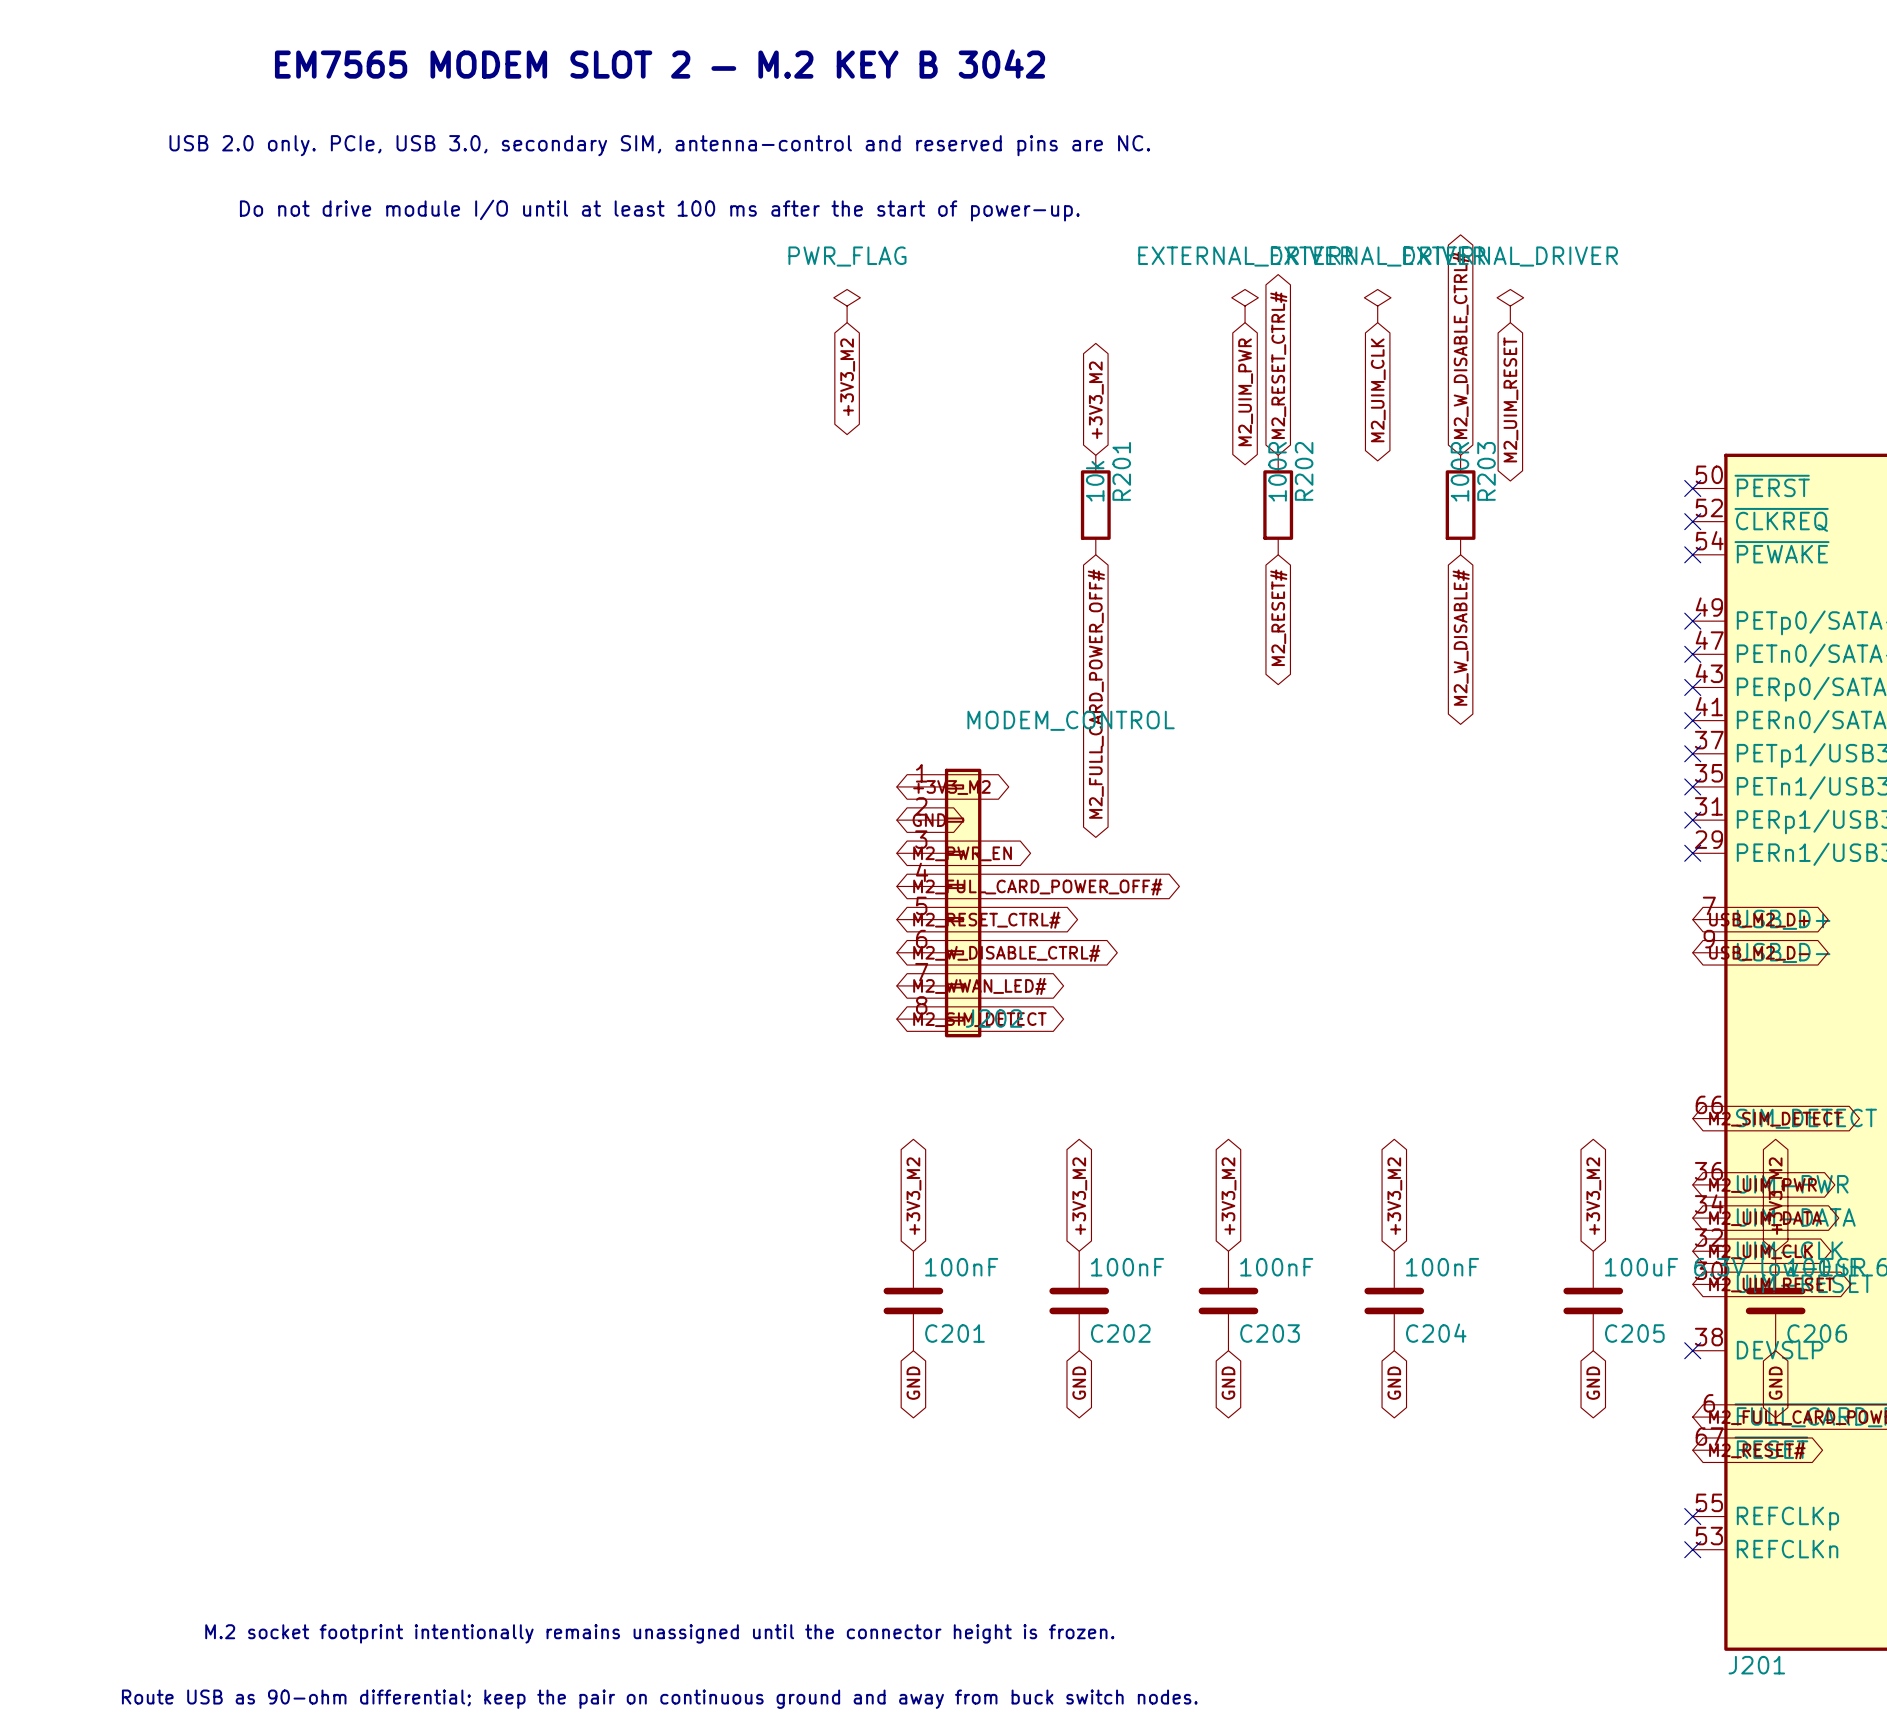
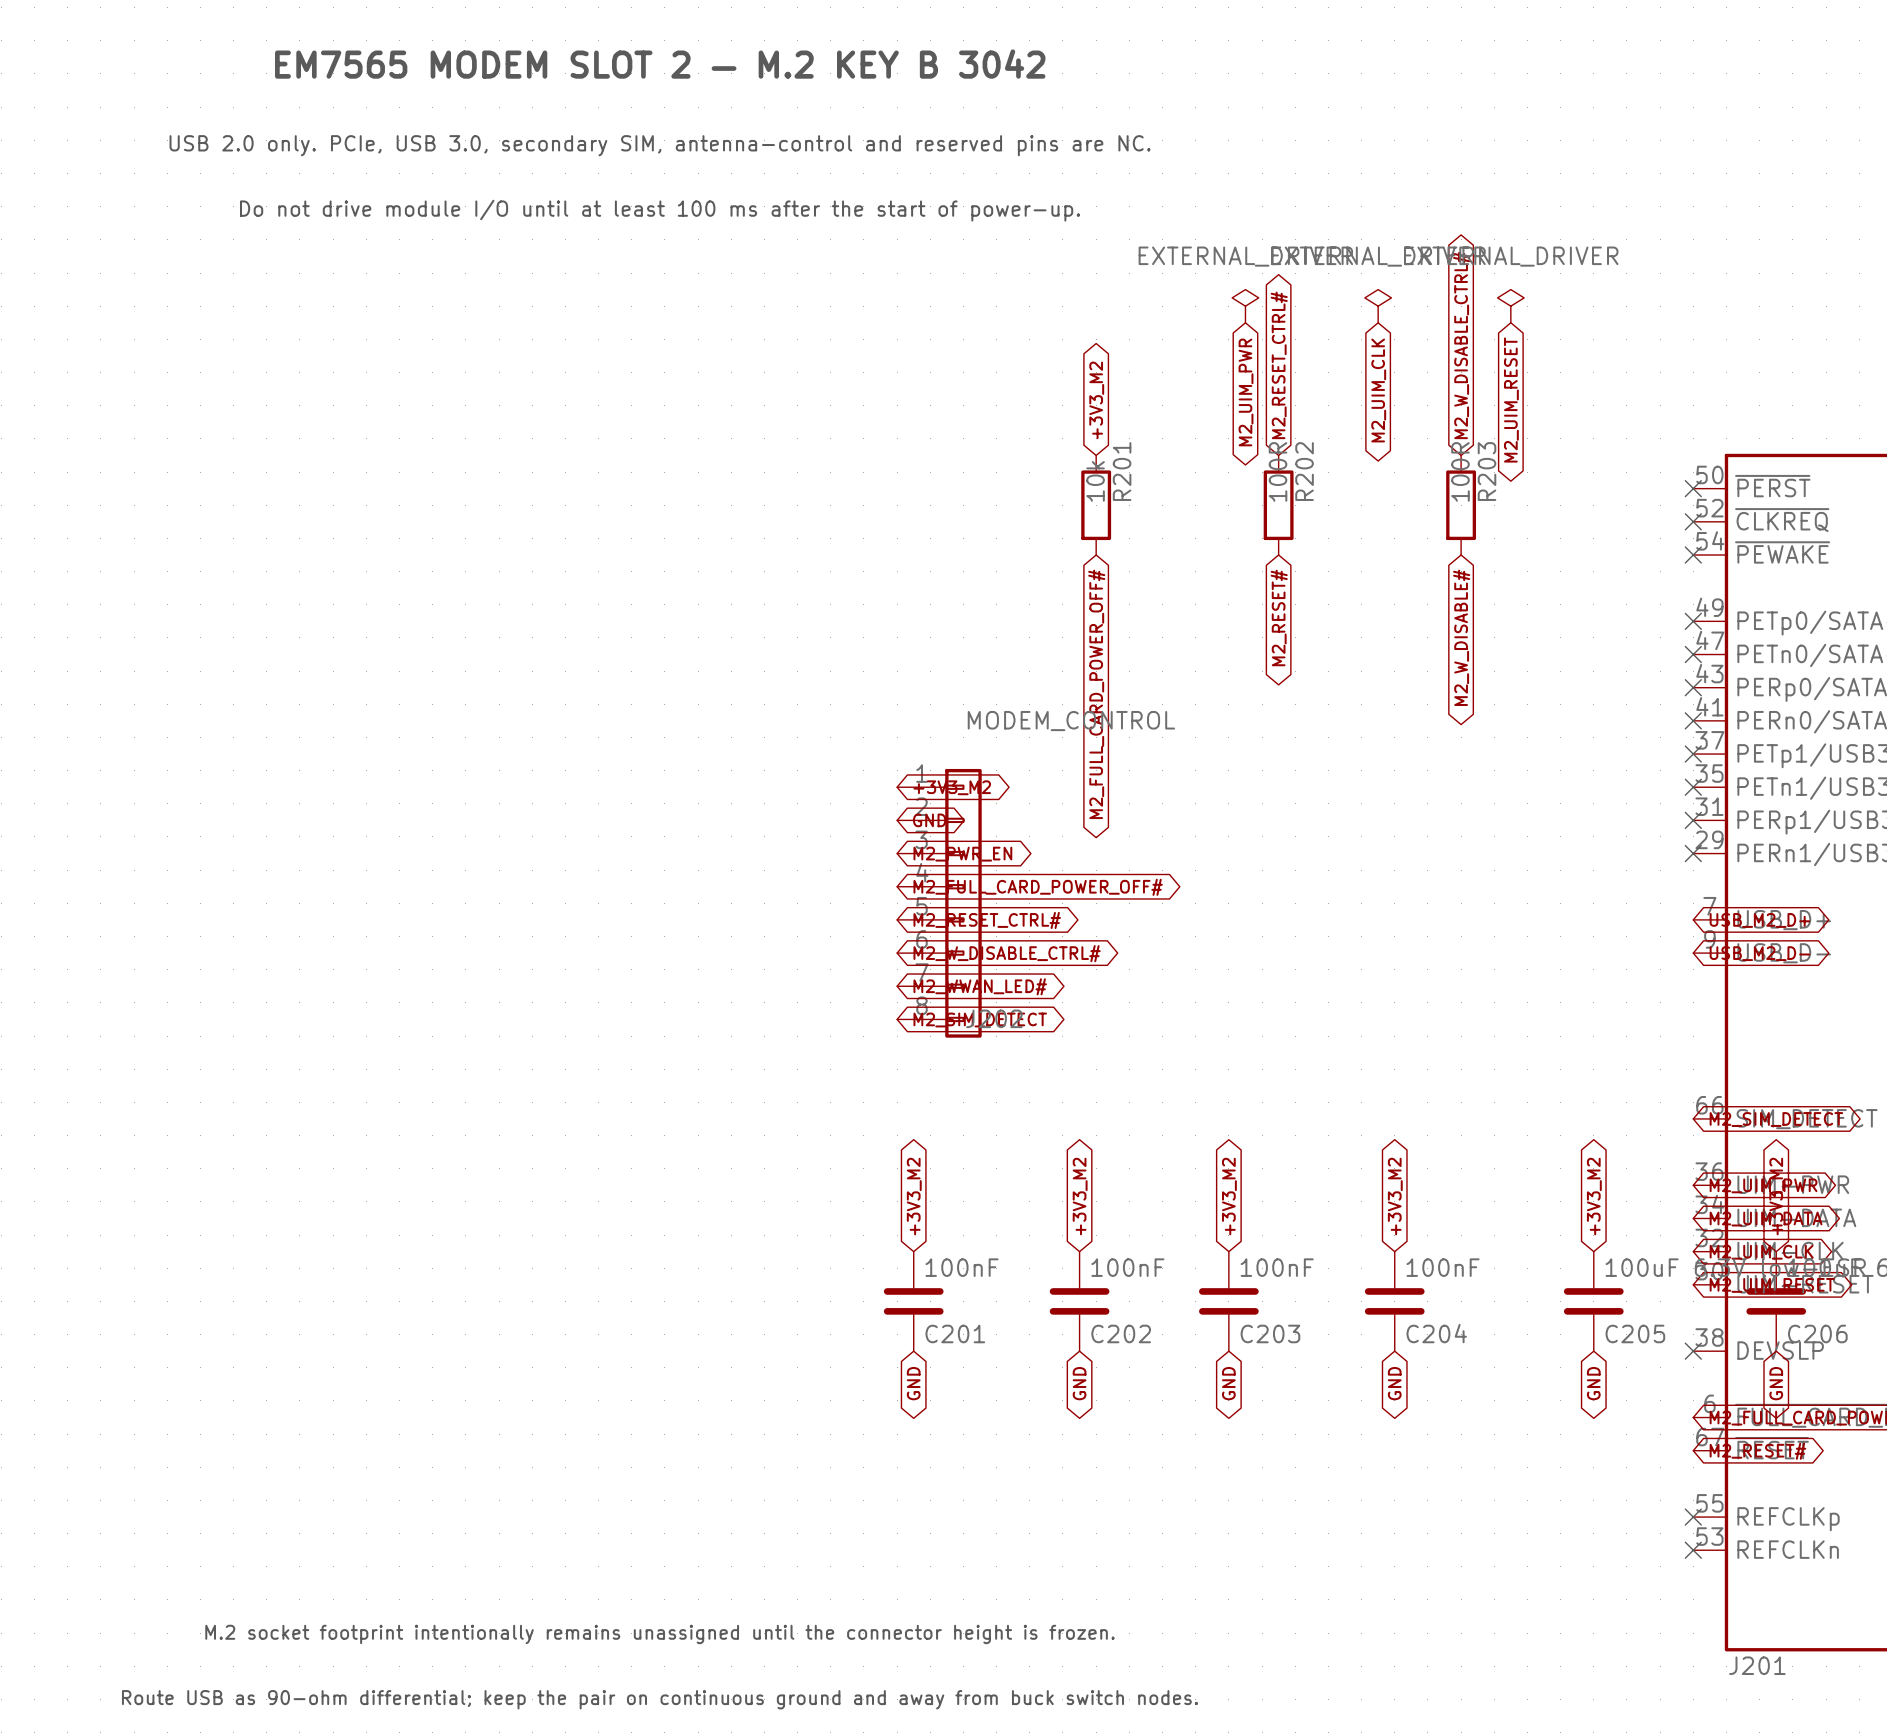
power symbol: PWR_FLAG (847, 306) -> none
global label: +3V3_M2 (847, 377) -> none

